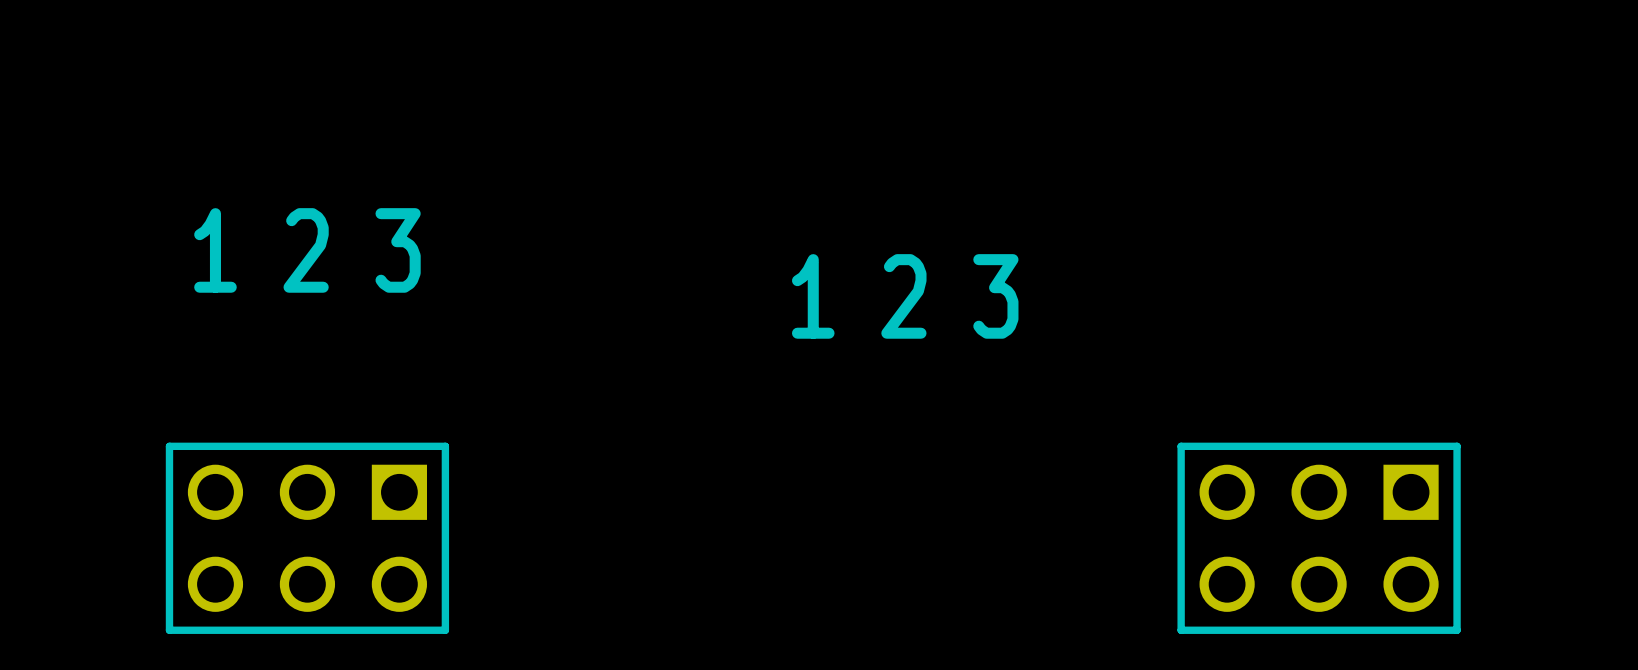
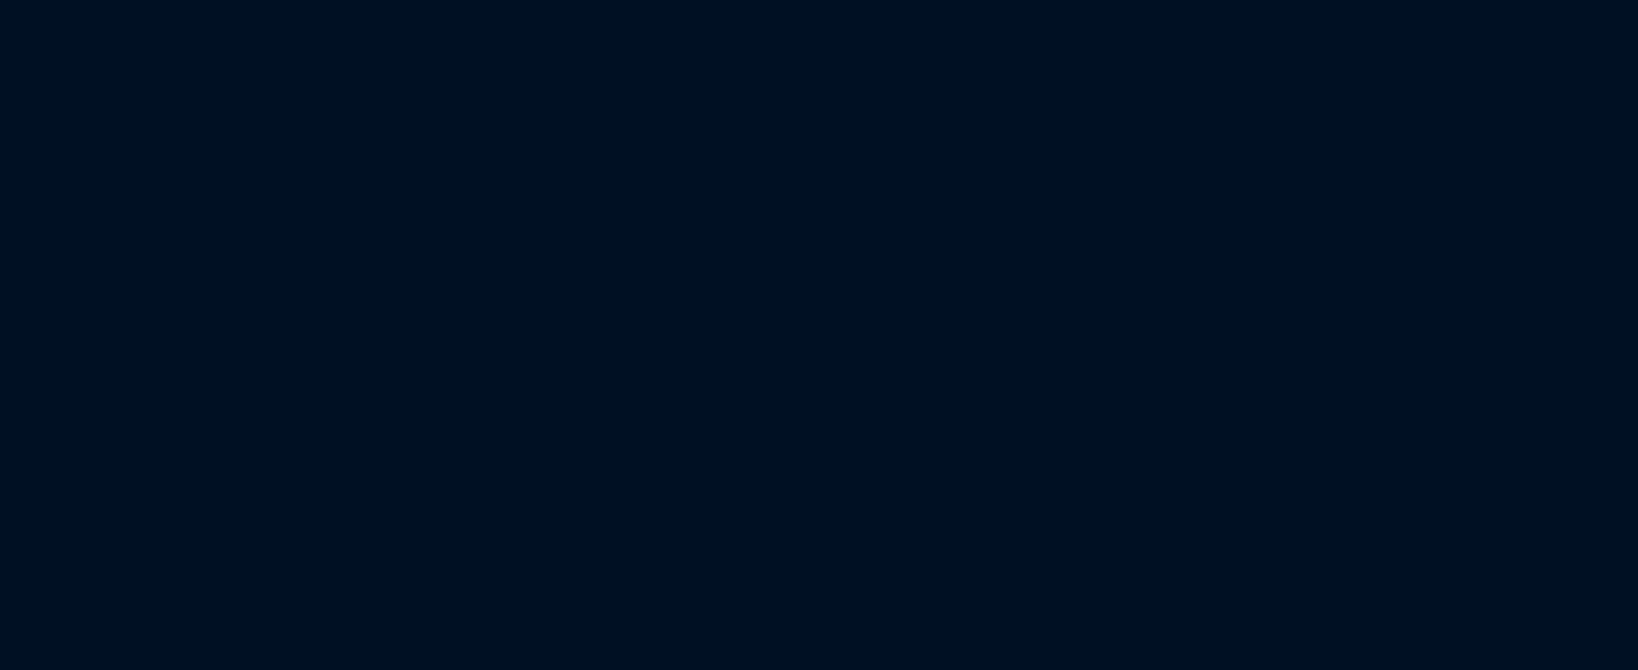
text: 1 (215, 250) -> none
text: 2 (306, 250) -> none
text: 3 (398, 250) -> none
text: 1 (813, 296) -> none
text: 2 (903, 296) -> none
text: 3 (995, 296) -> none
part: (307, 538) -> none
part: (1319, 538) -> none

